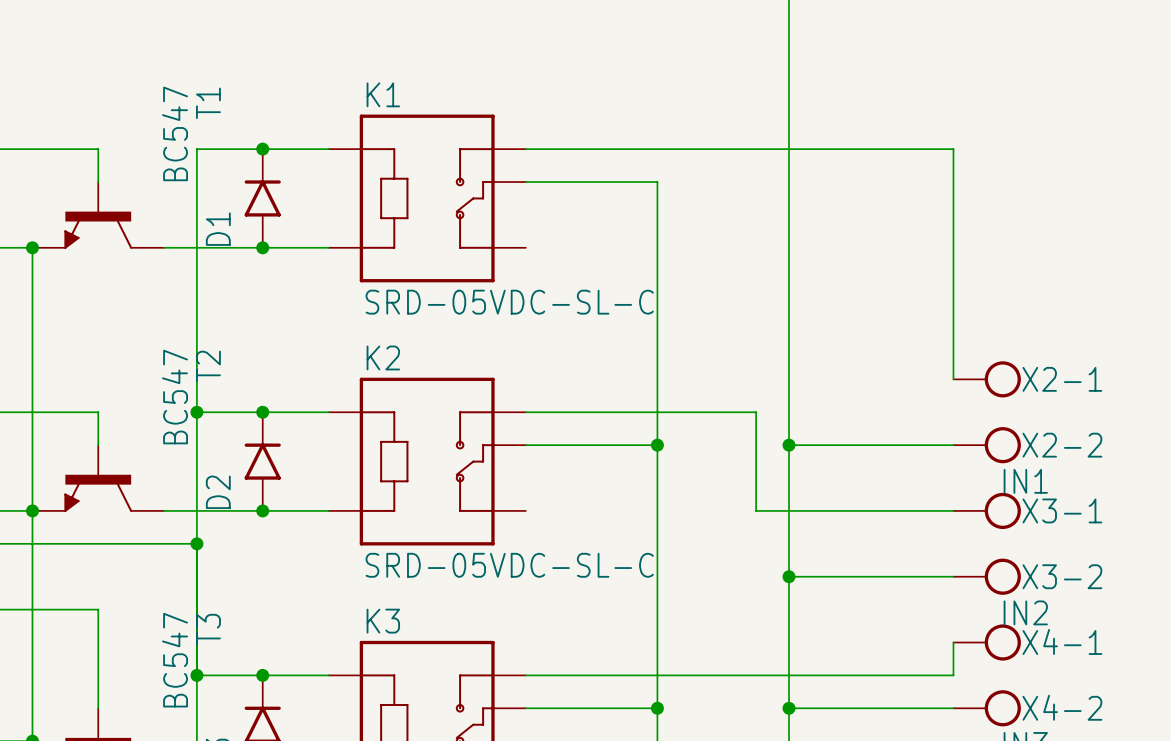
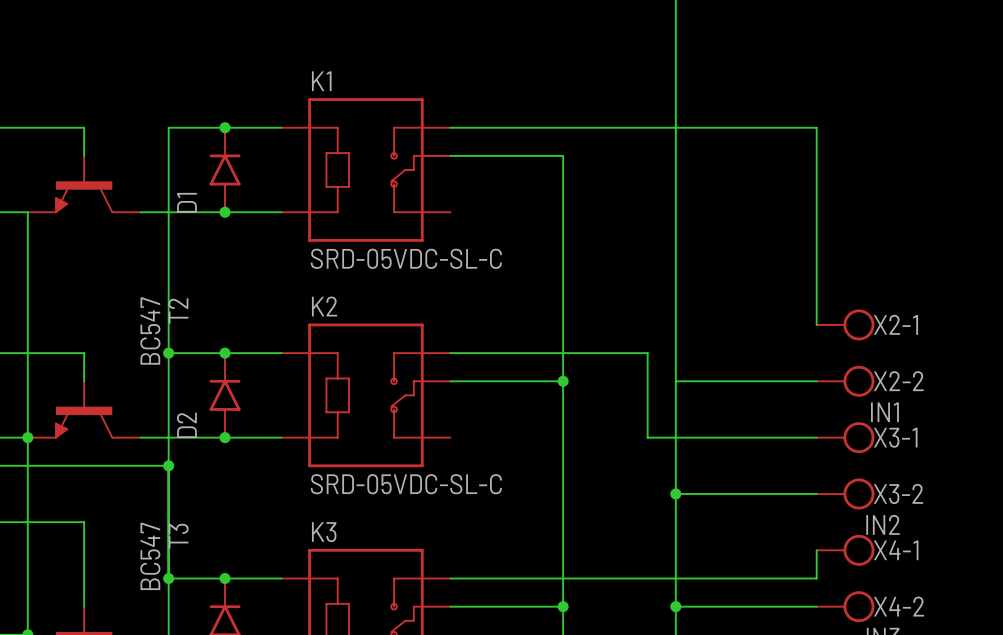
T1 name: T1 (208, 103) -> none
T1 value: BC547 (175, 133) -> none
junction: (32, 247) -> none
junction: (789, 445) -> none

